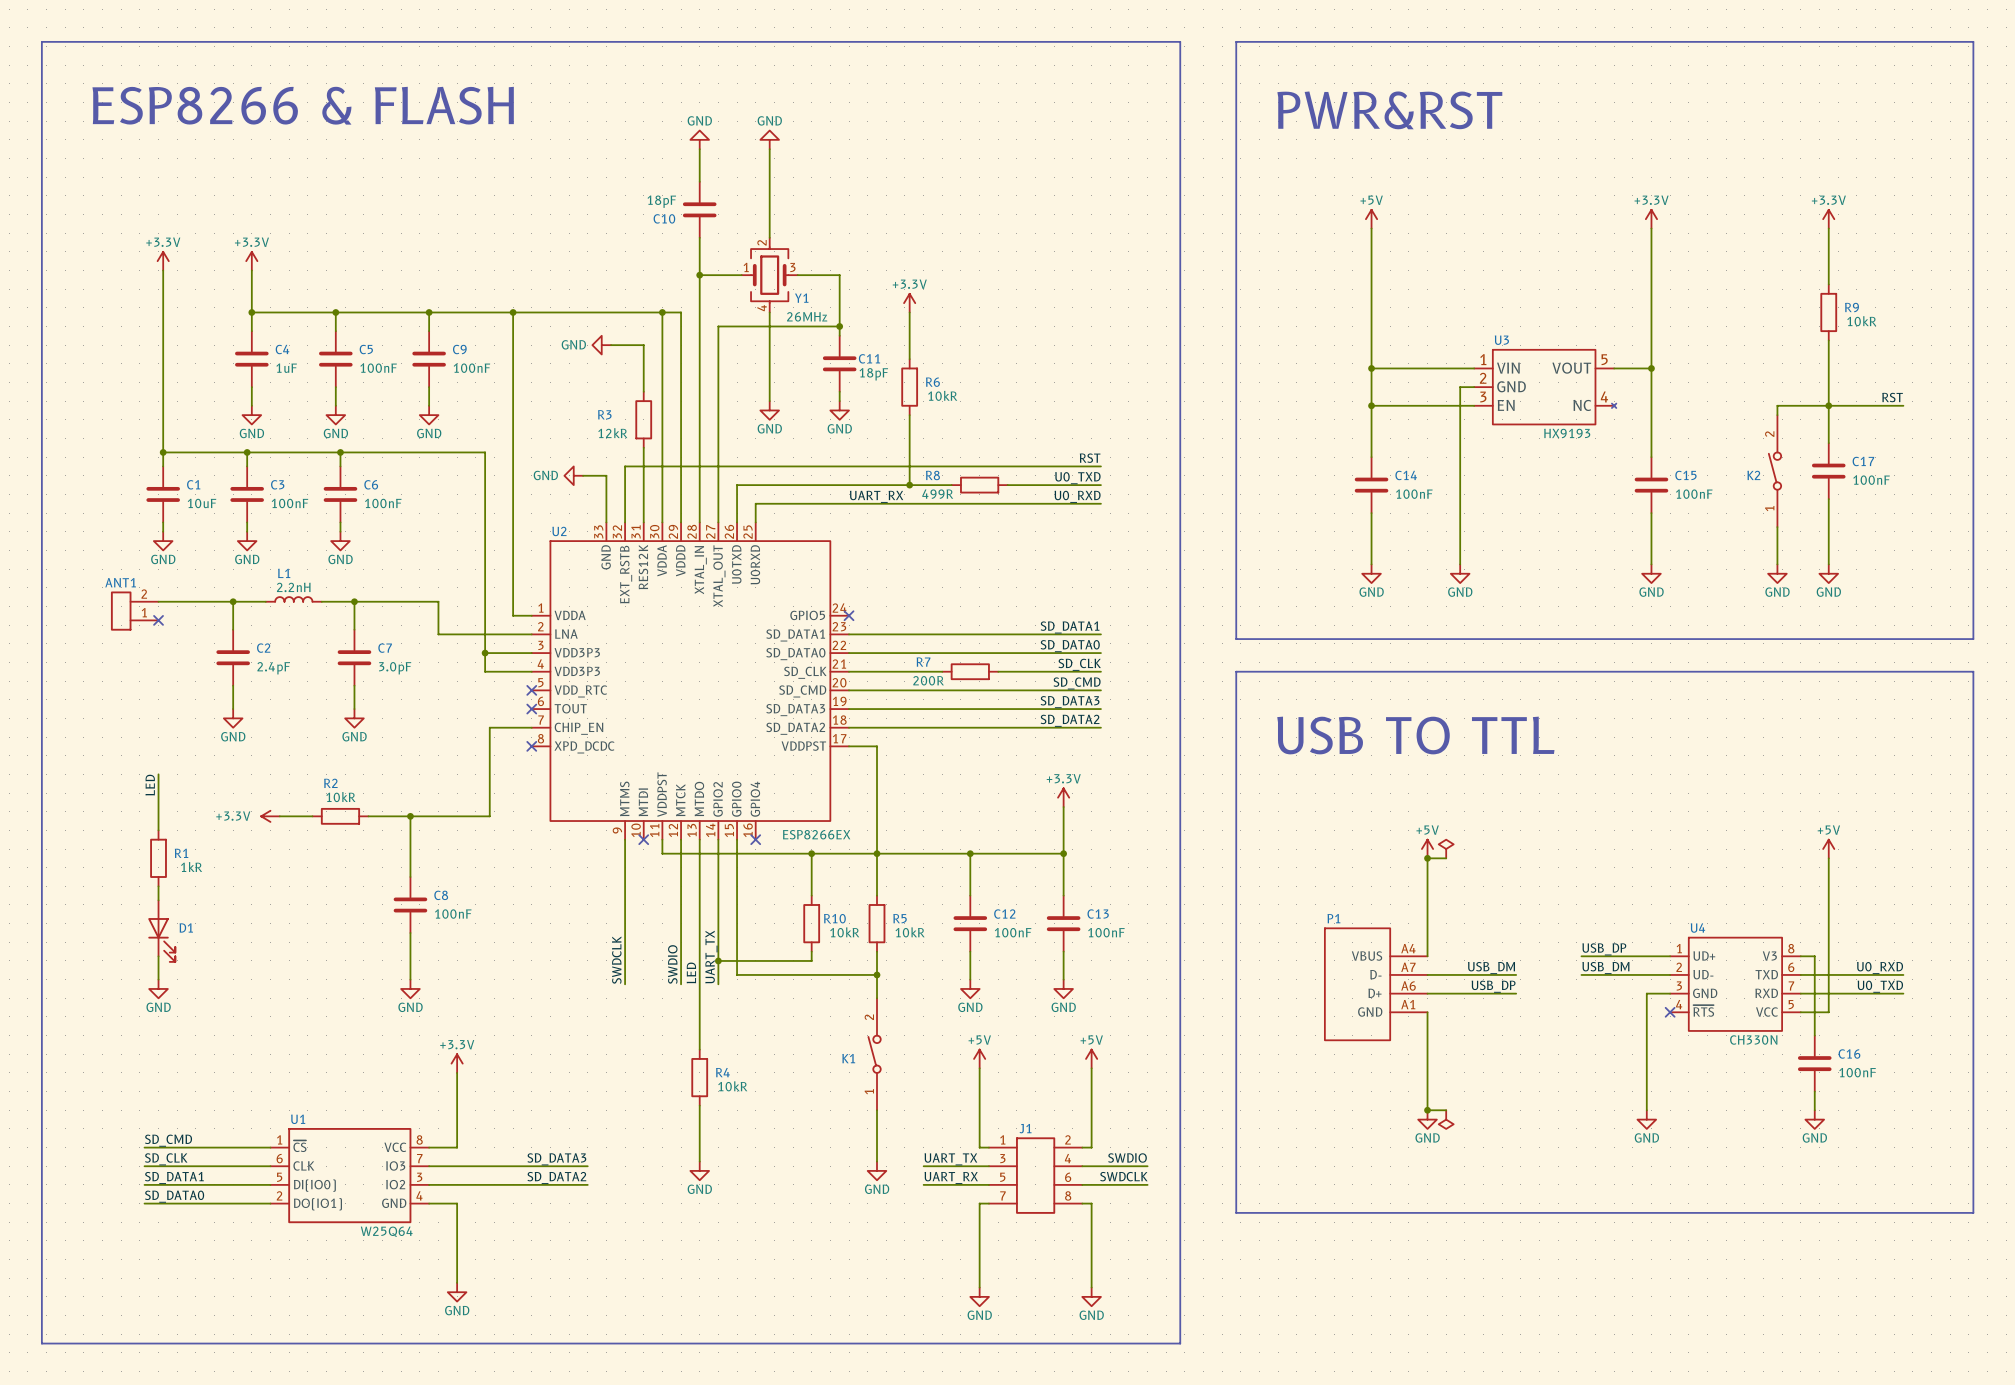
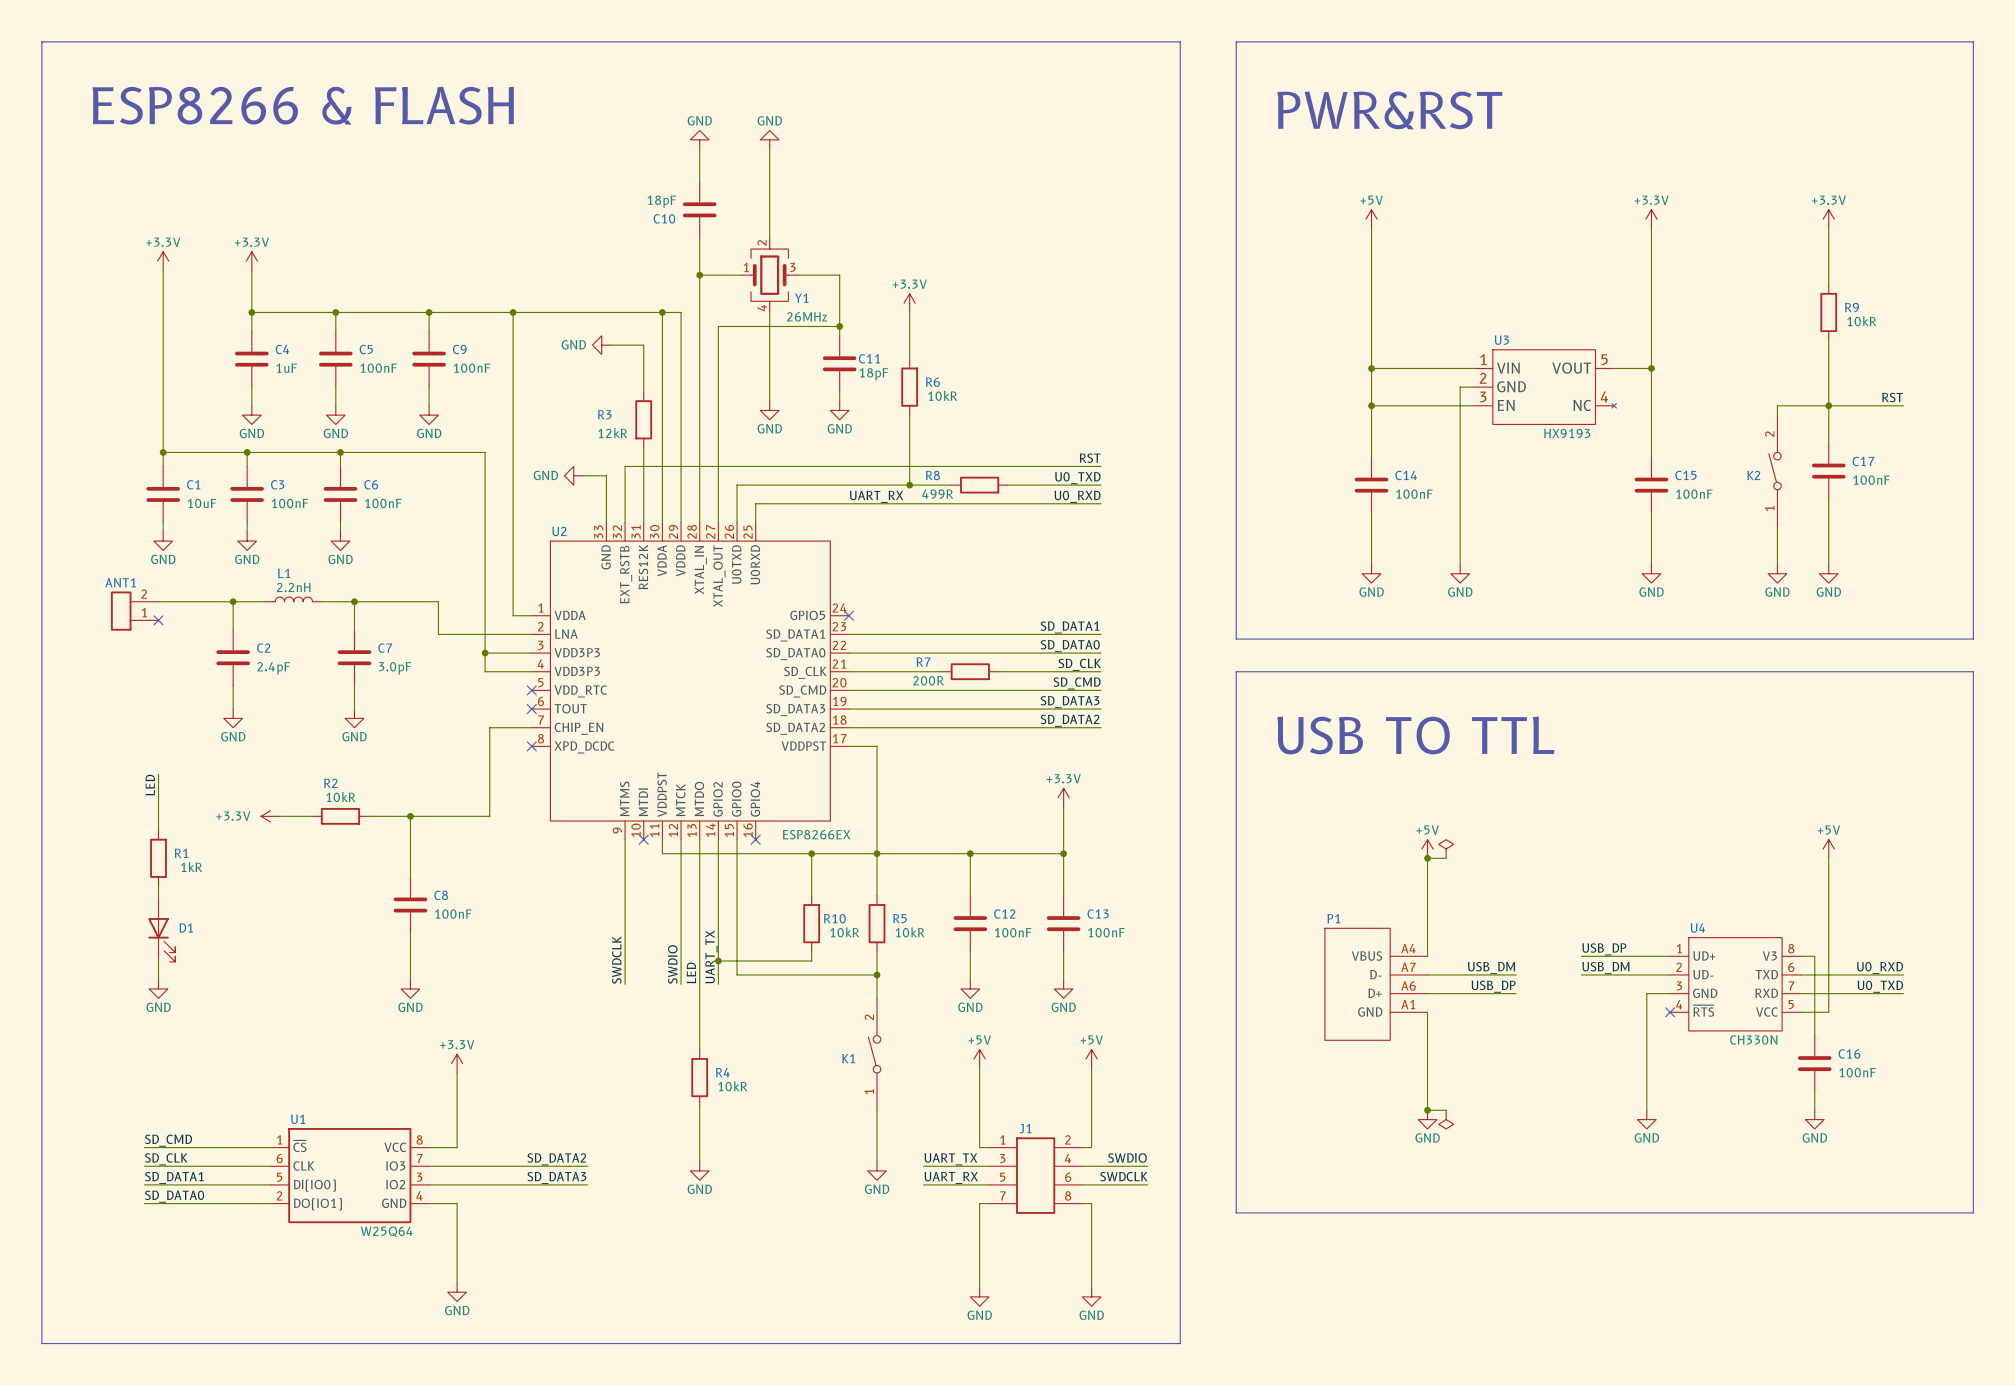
label: SD_DATA3 (556, 1159) -> SD_DATA2 (556, 1159)
label: SD_DATA2 (556, 1177) -> SD_DATA3 (556, 1177)

